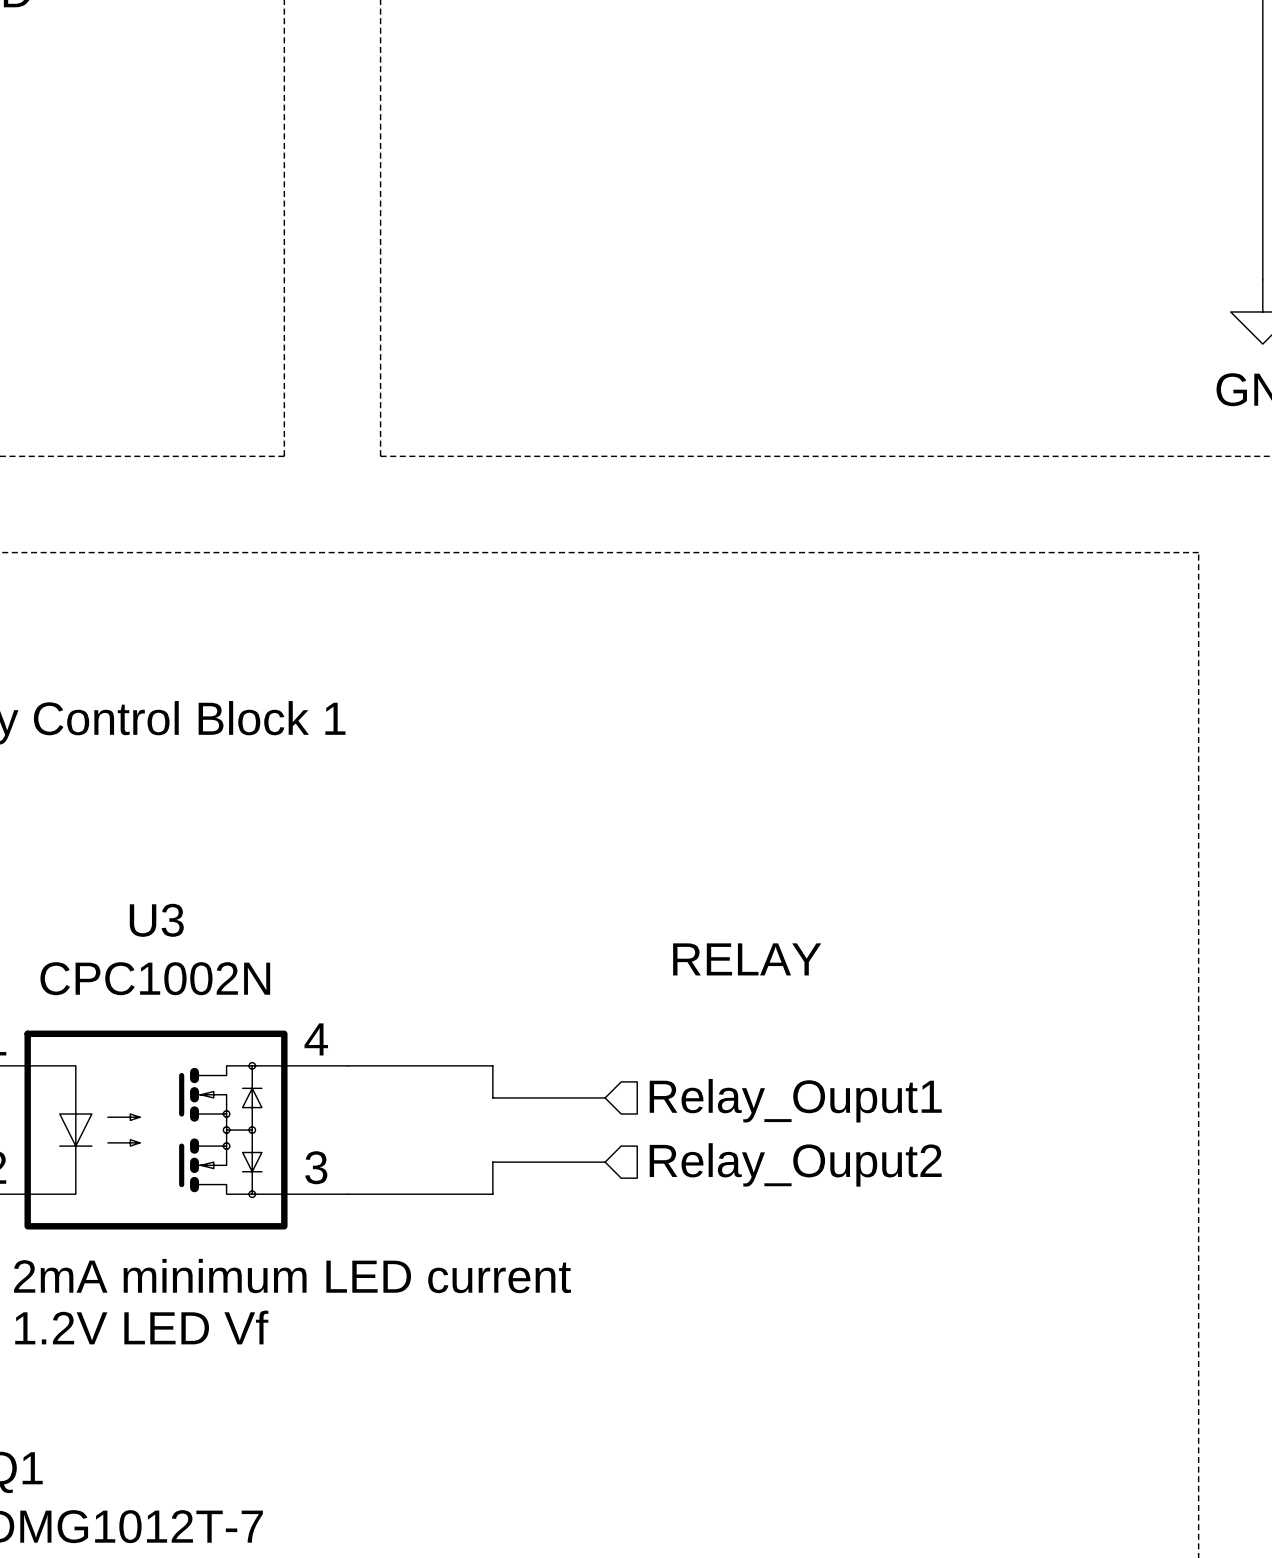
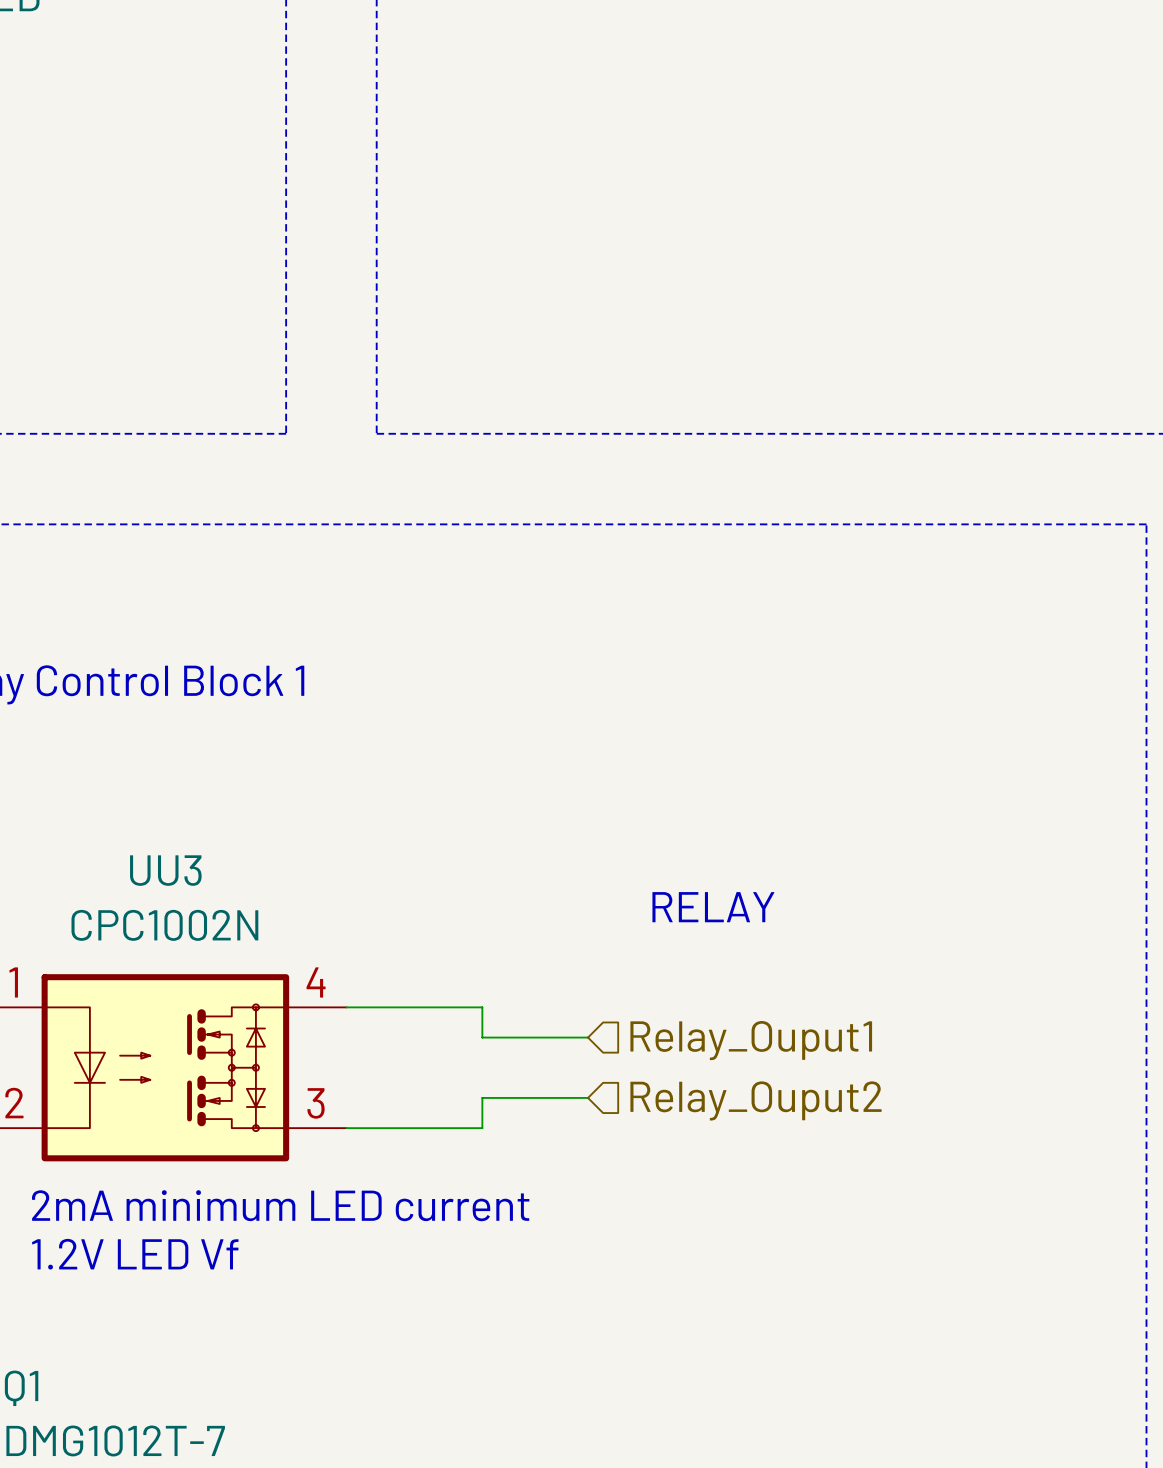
U3 name: U3 (156, 920) -> UU3 (165, 870)

